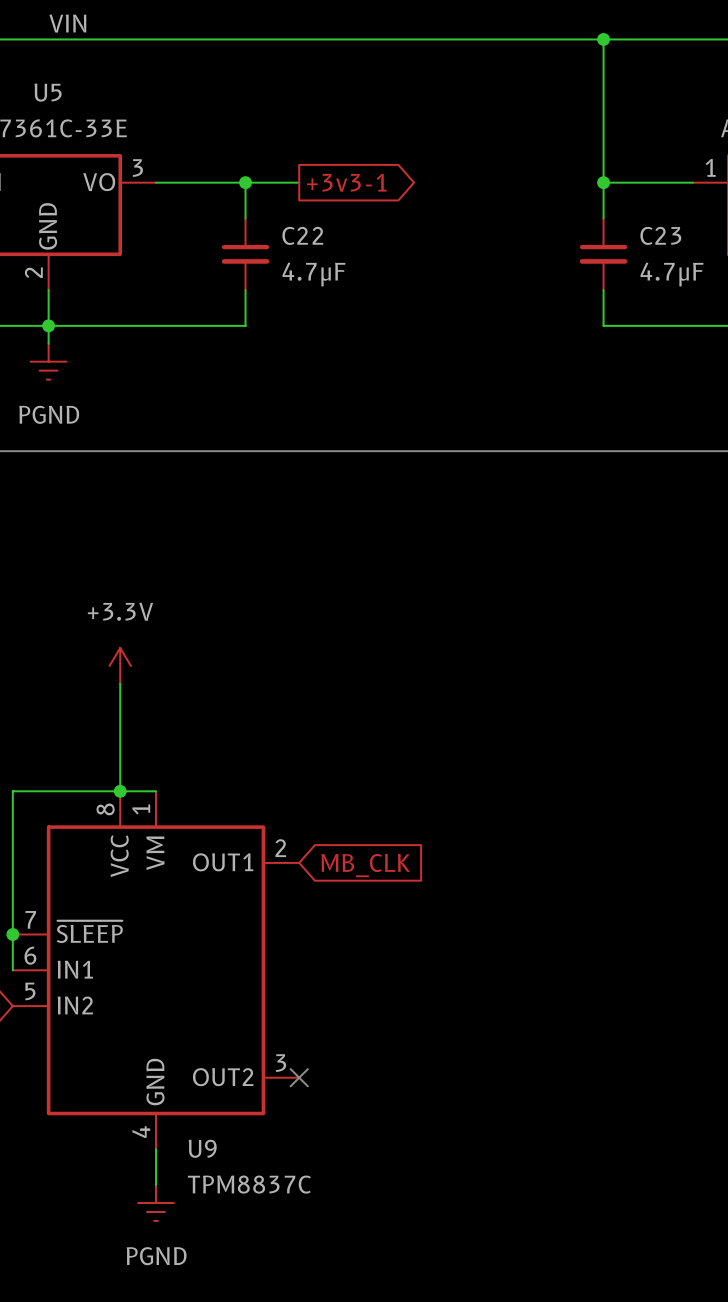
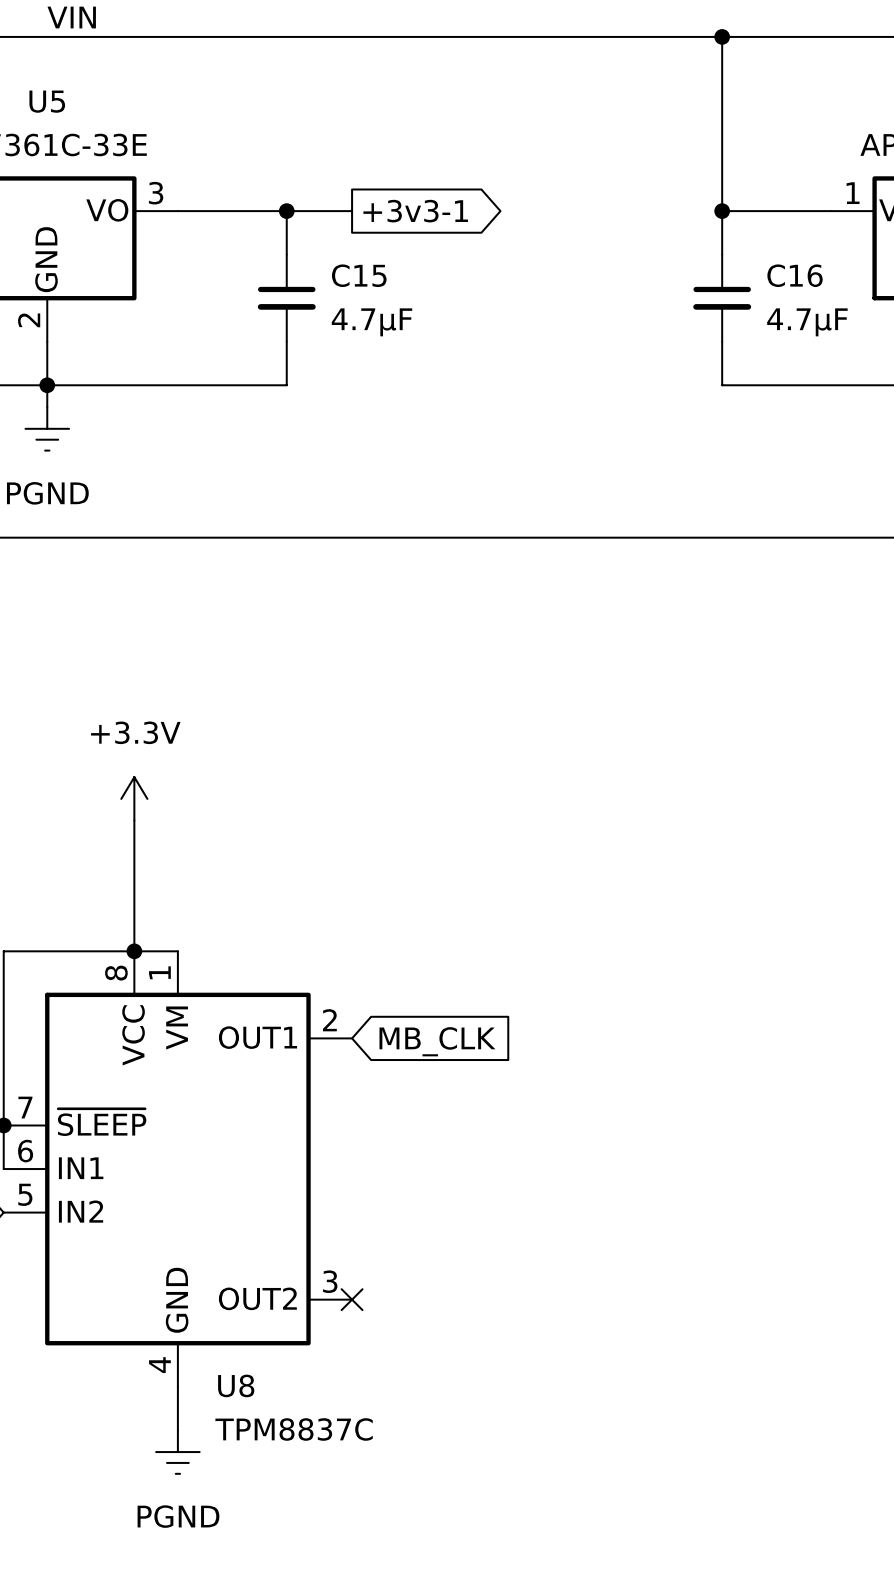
C22 name: C22 (302, 235) -> C15 (359, 275)
C23 name: C23 (660, 235) -> C16 (795, 275)
U9 name: U9 (202, 1148) -> U8 (236, 1385)

